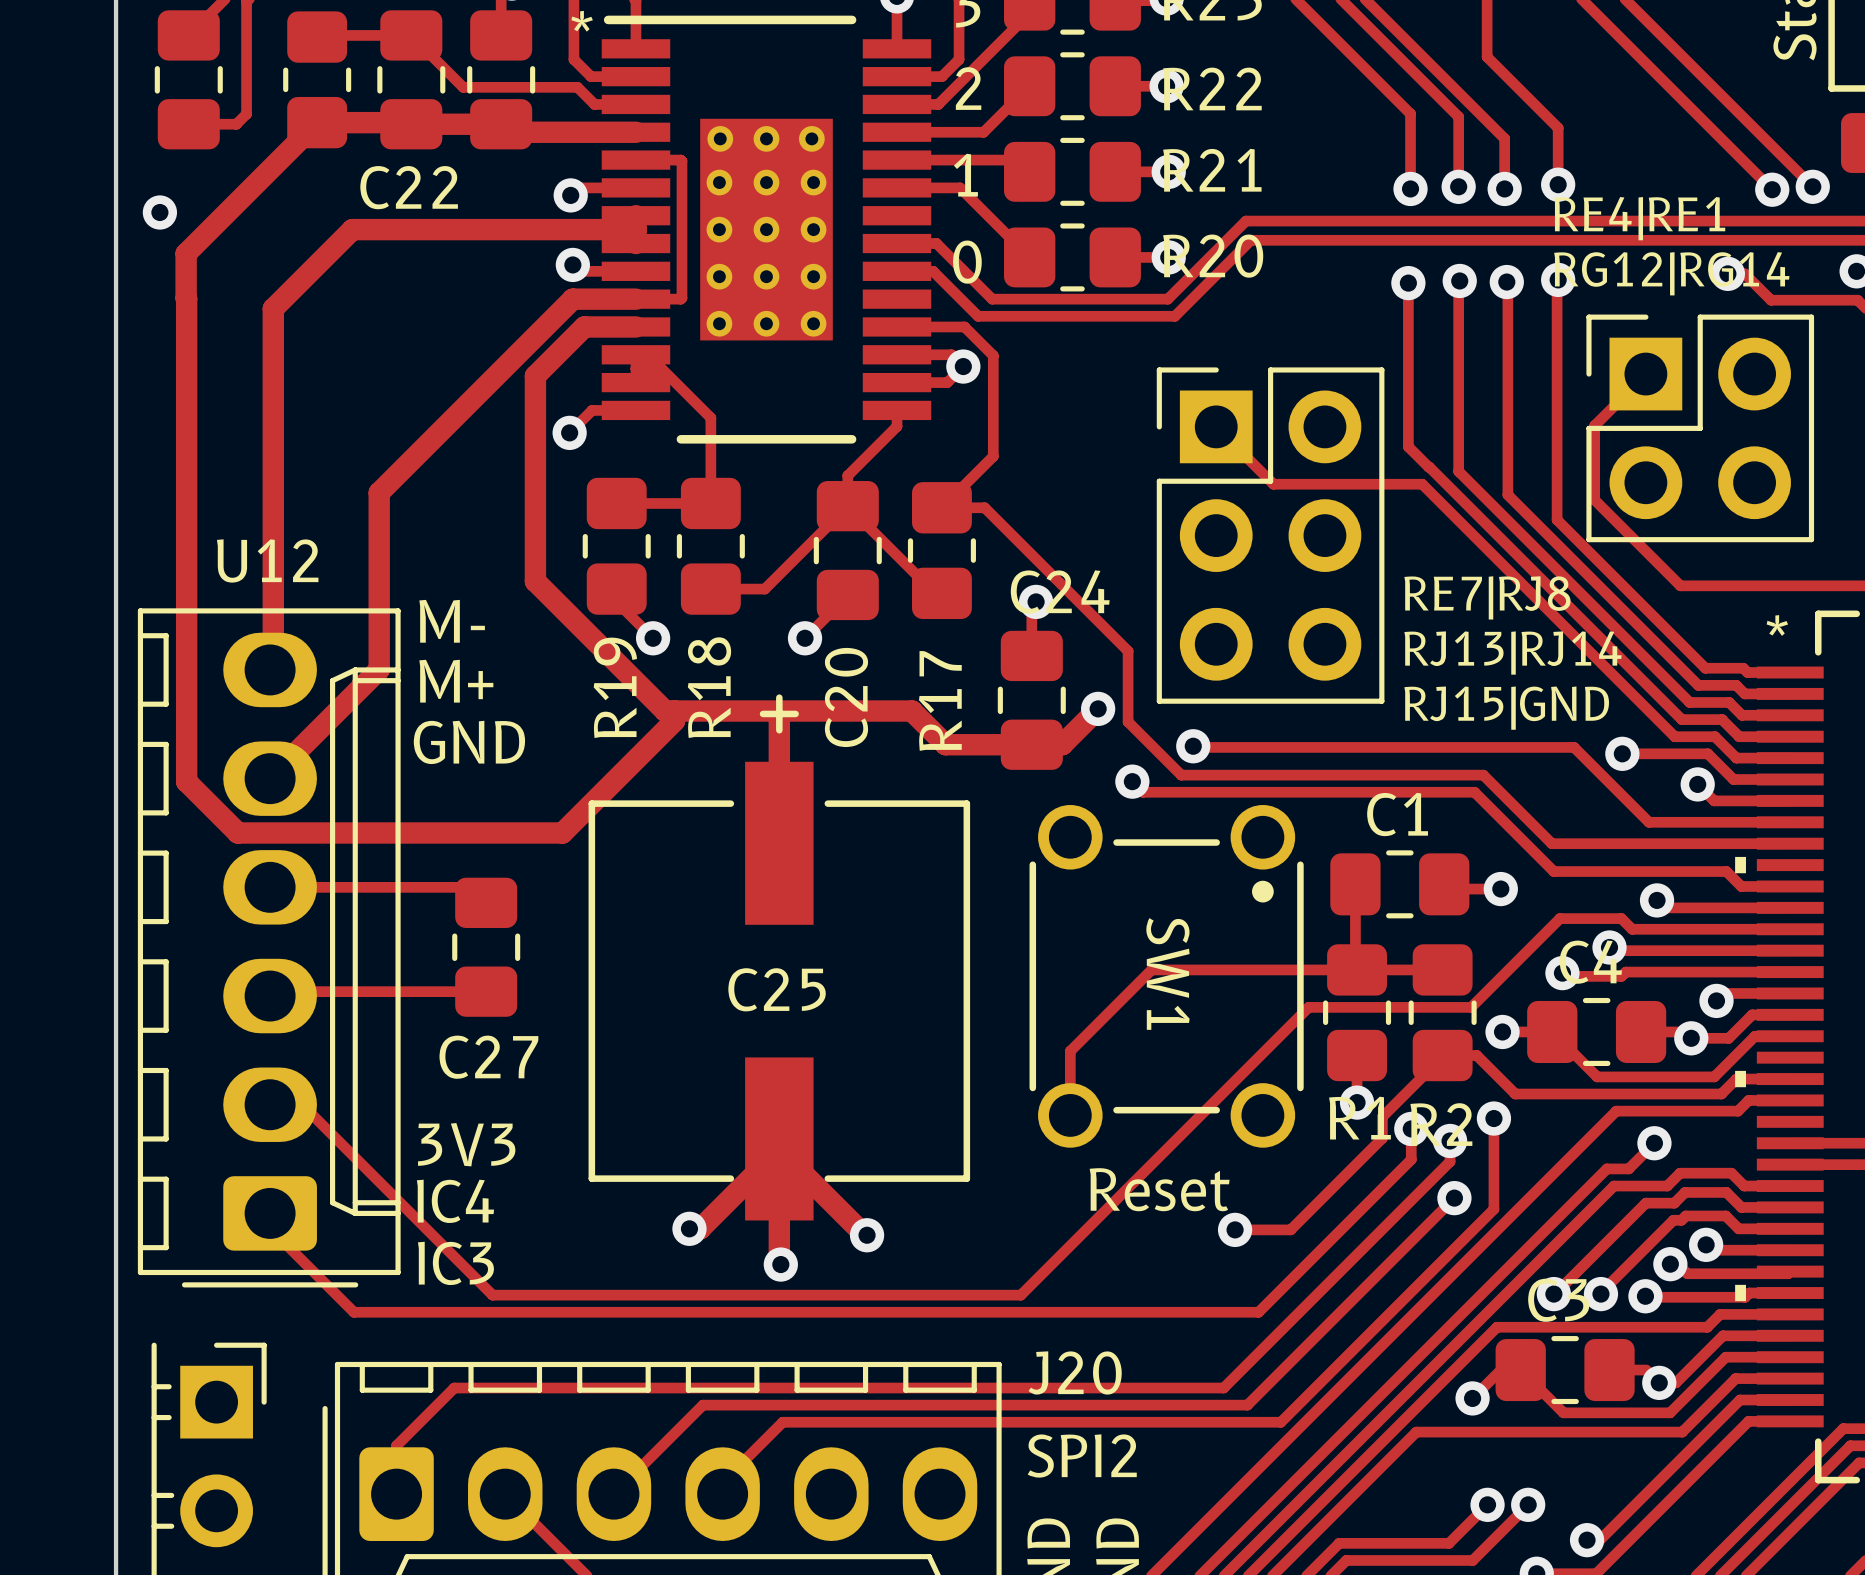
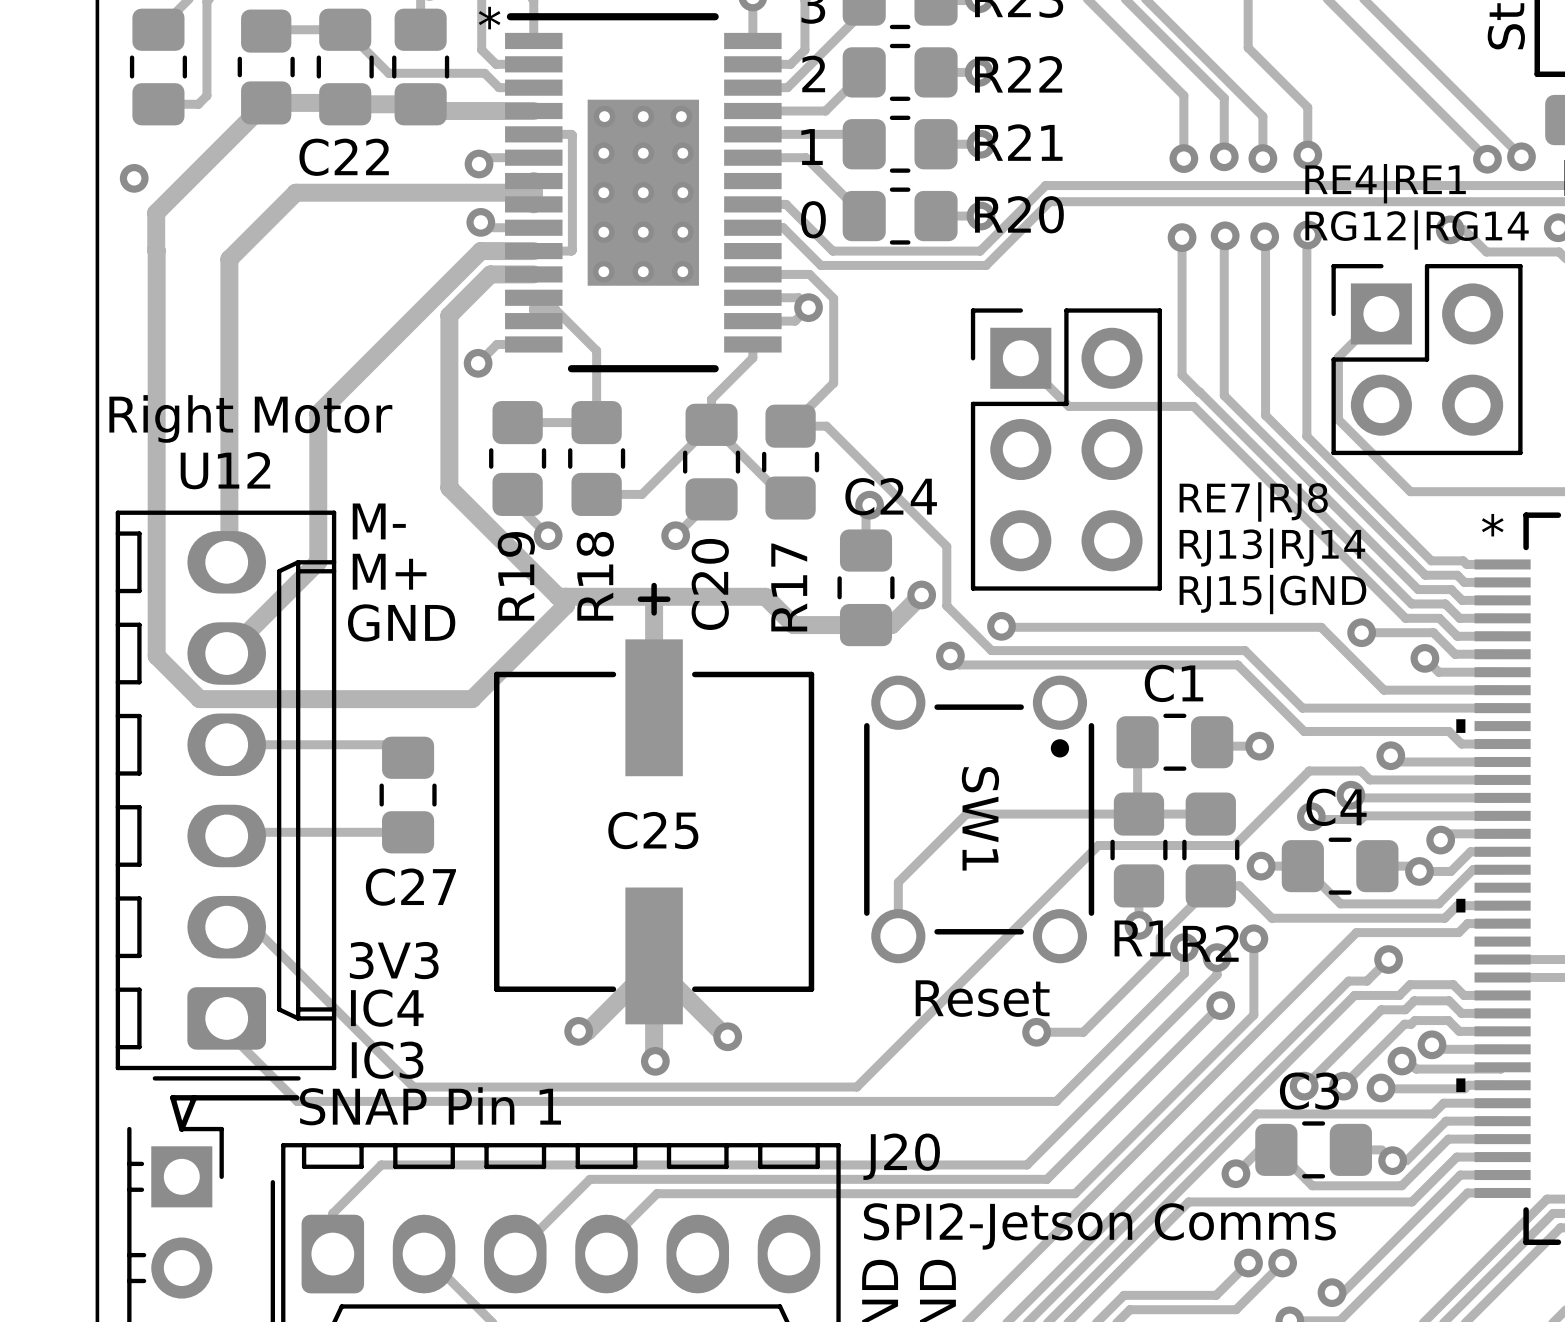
text: none -> Right Motor (250, 418)
line: none -> (194, 1097) (181, 1129) (172, 1097) (296, 1097)
text: none -> SNAP Pin 1 (430, 1106)
text: SPI2 (1082, 1455) -> SPI2-Jetson Comms (1099, 1226)

